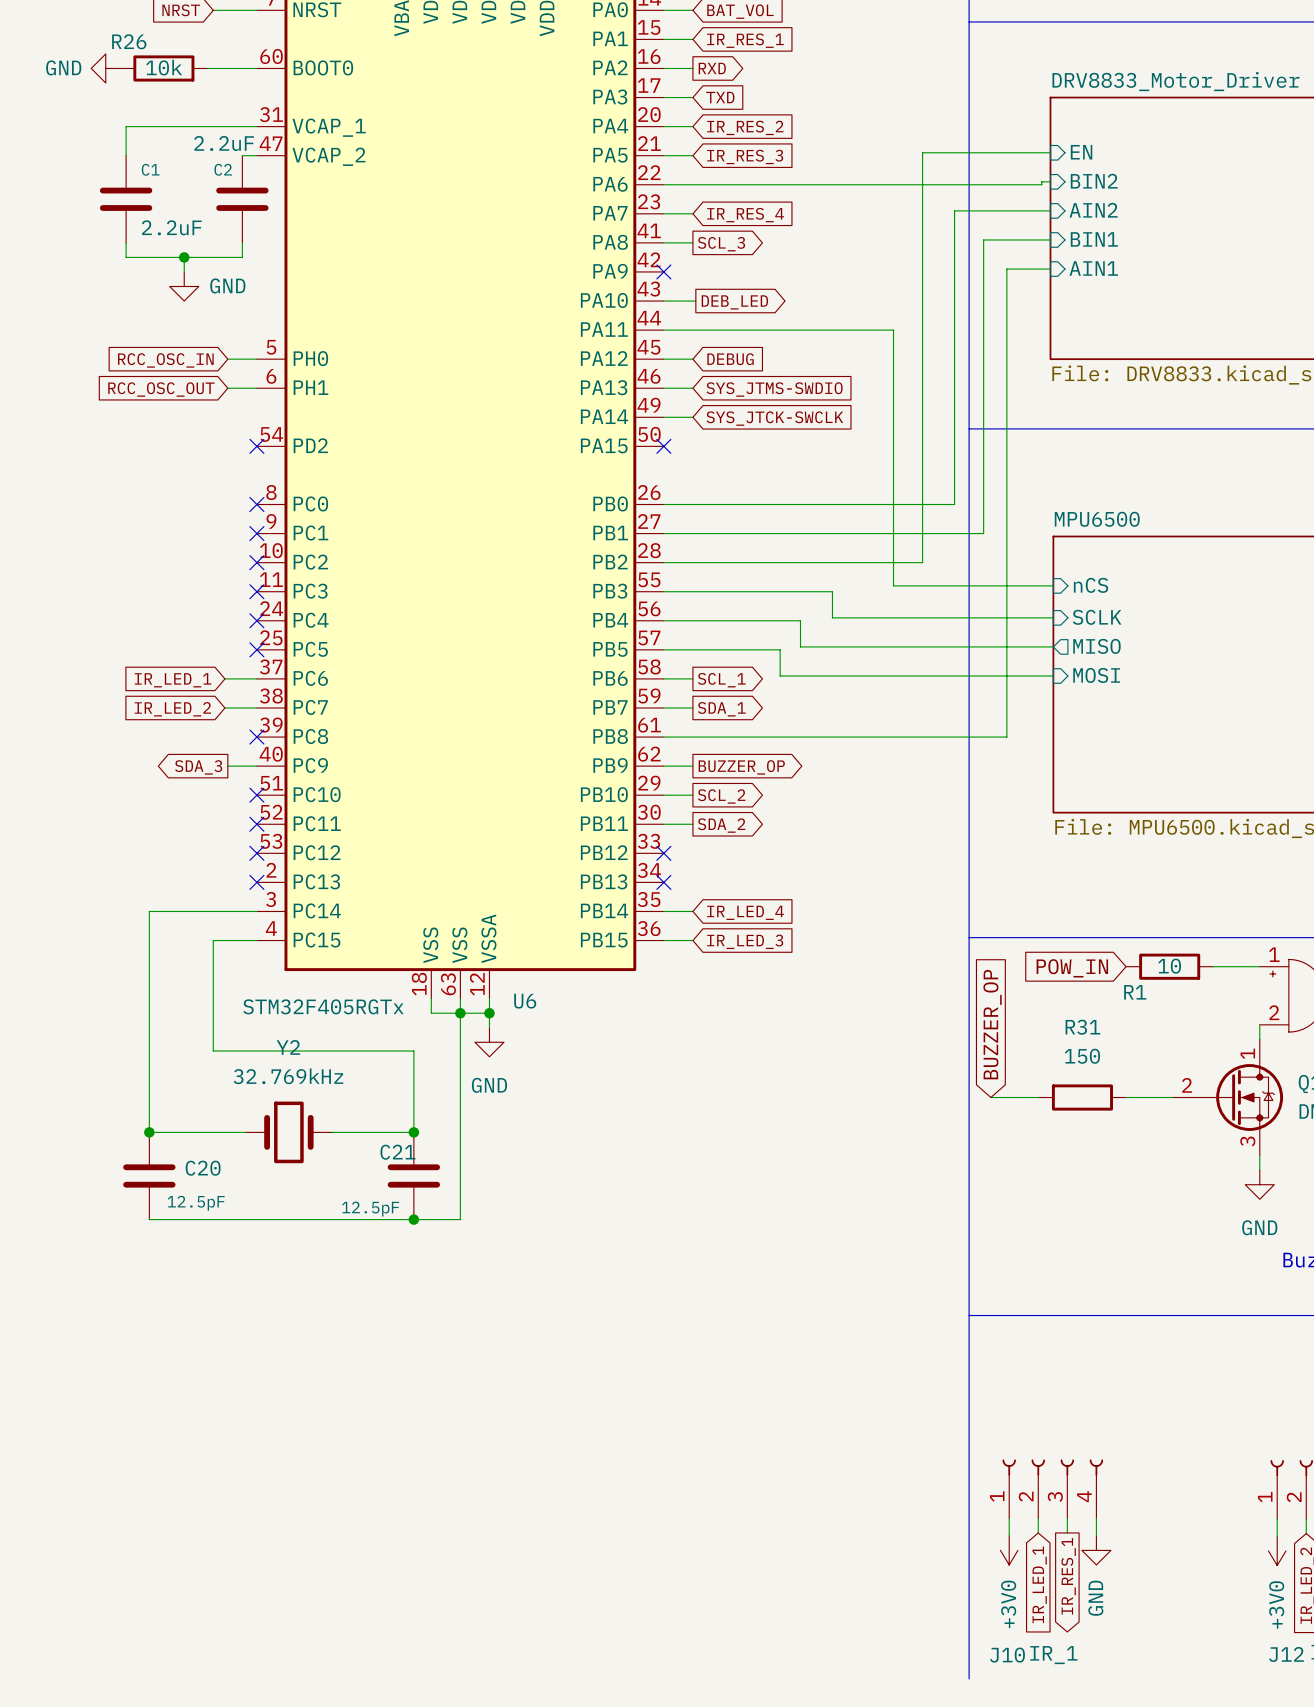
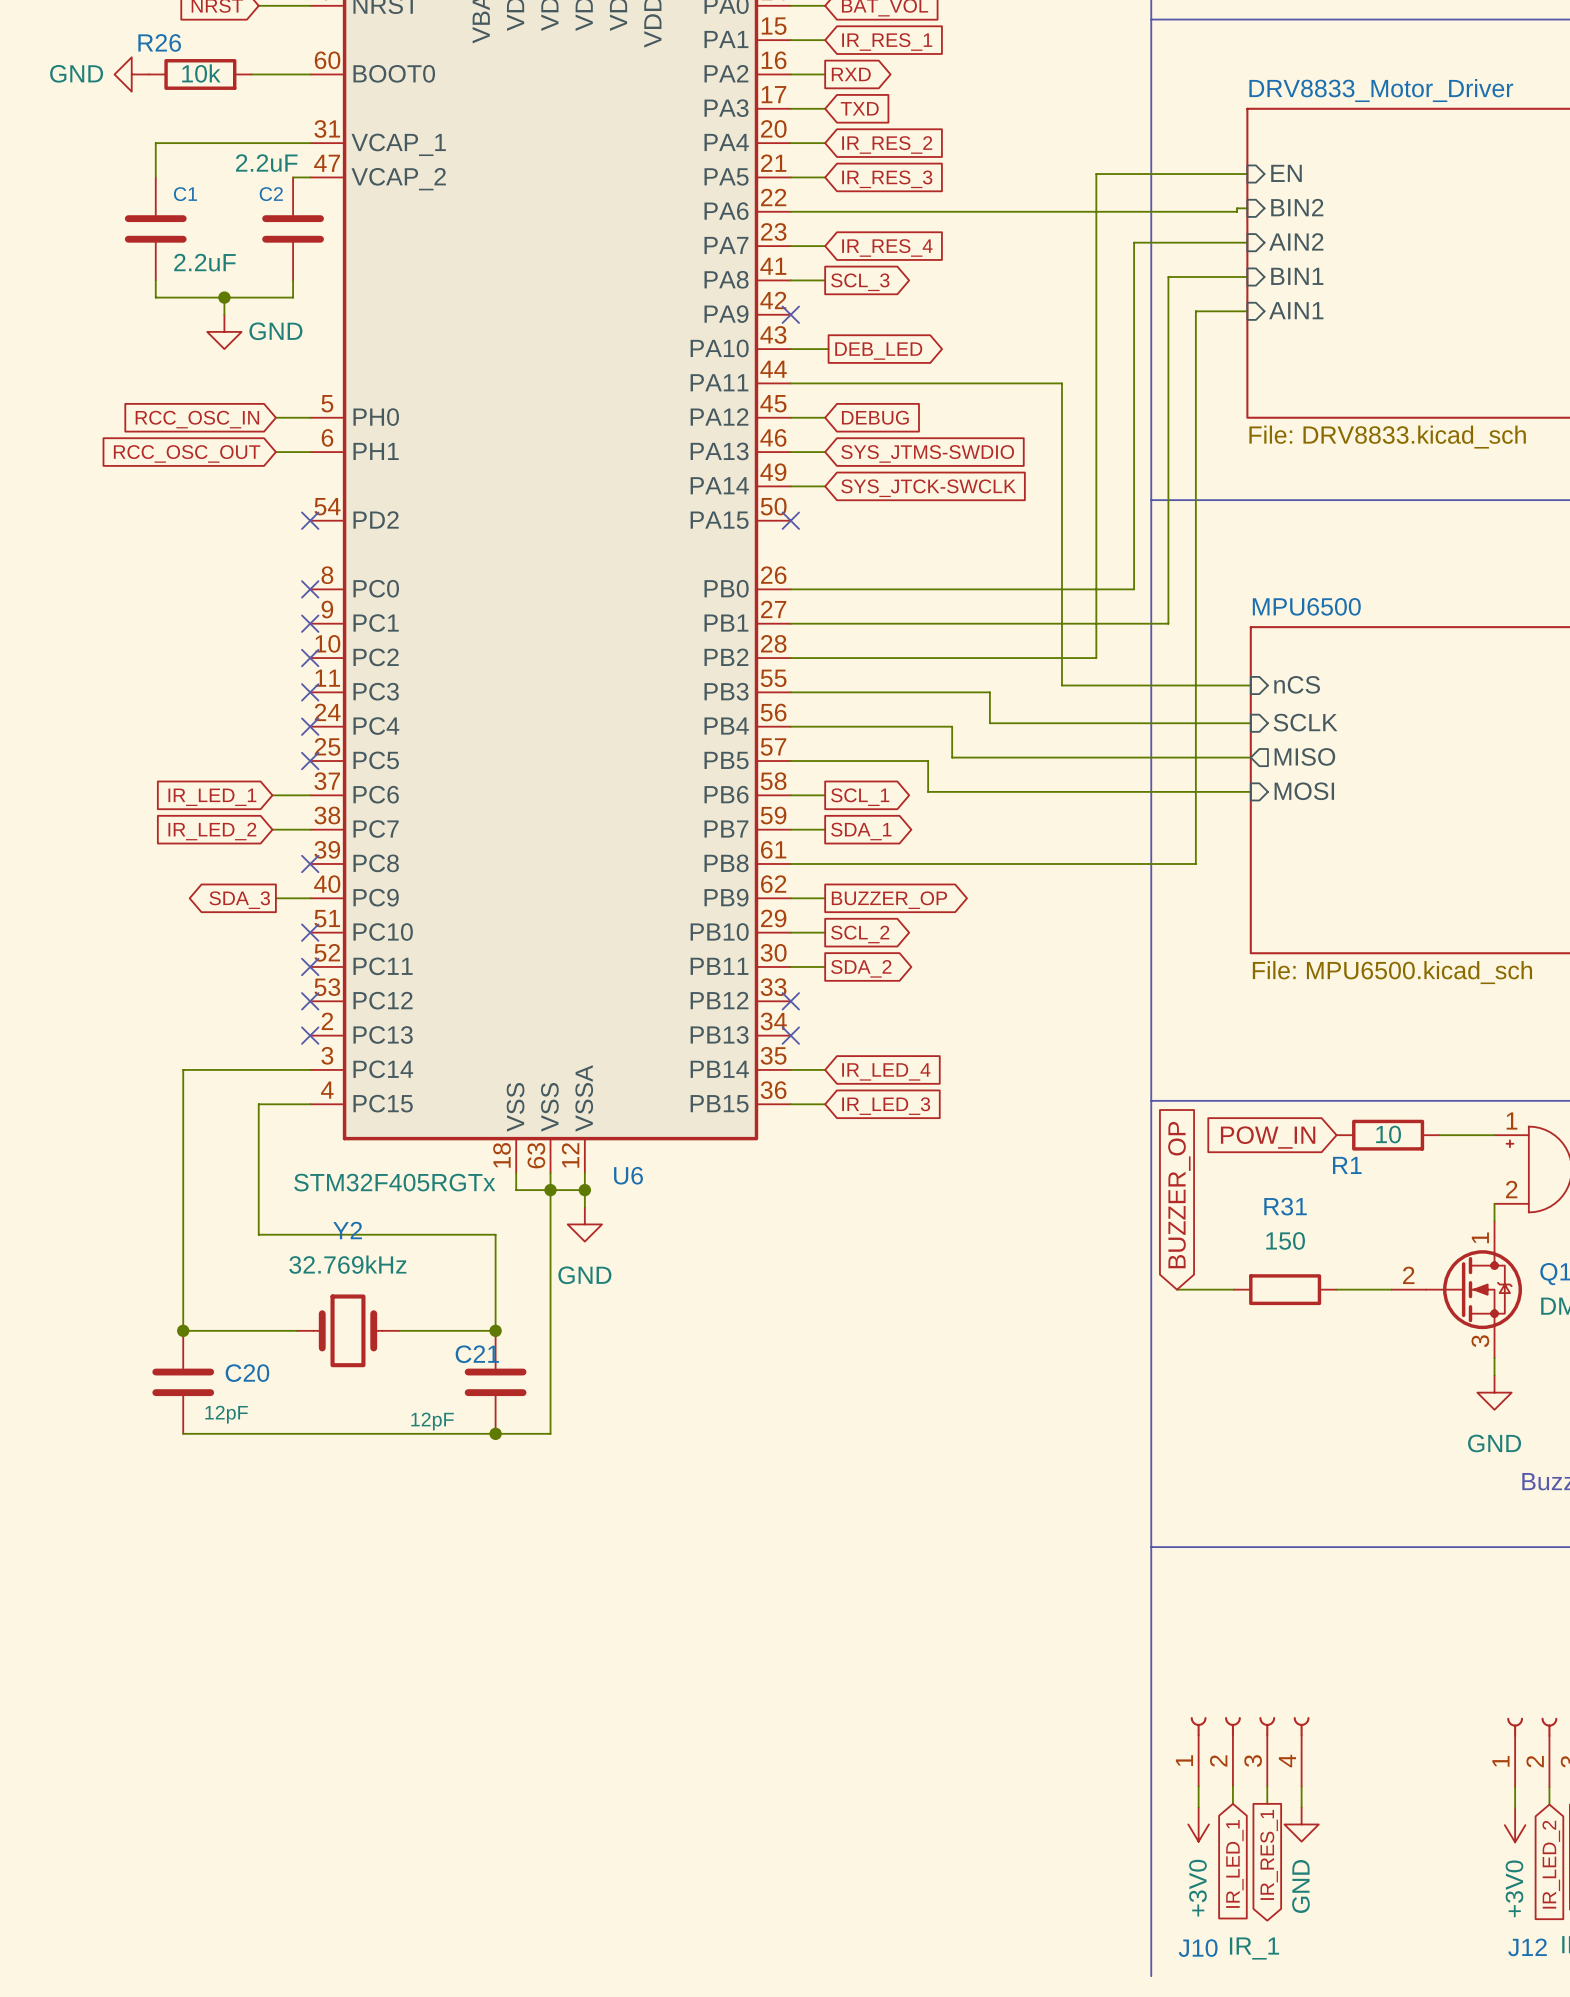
C20 value: 12.5pF (196, 1203) -> 12pF (226, 1414)
C21 value: 12.5pF (370, 1209) -> 12pF (432, 1421)

